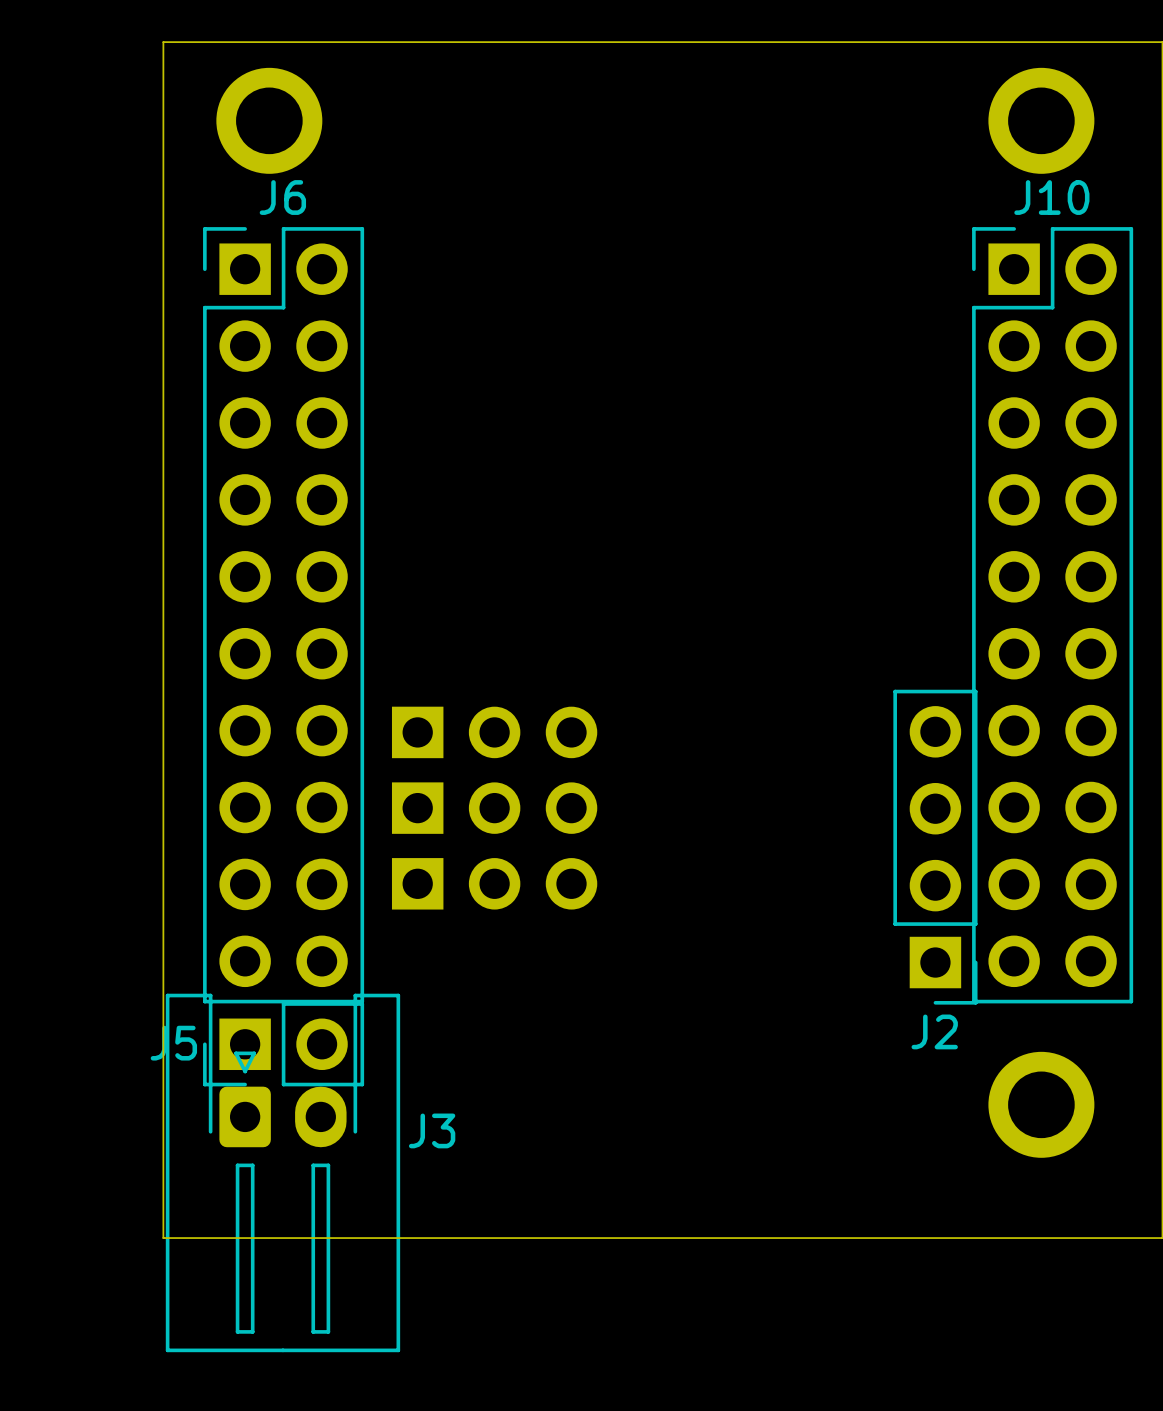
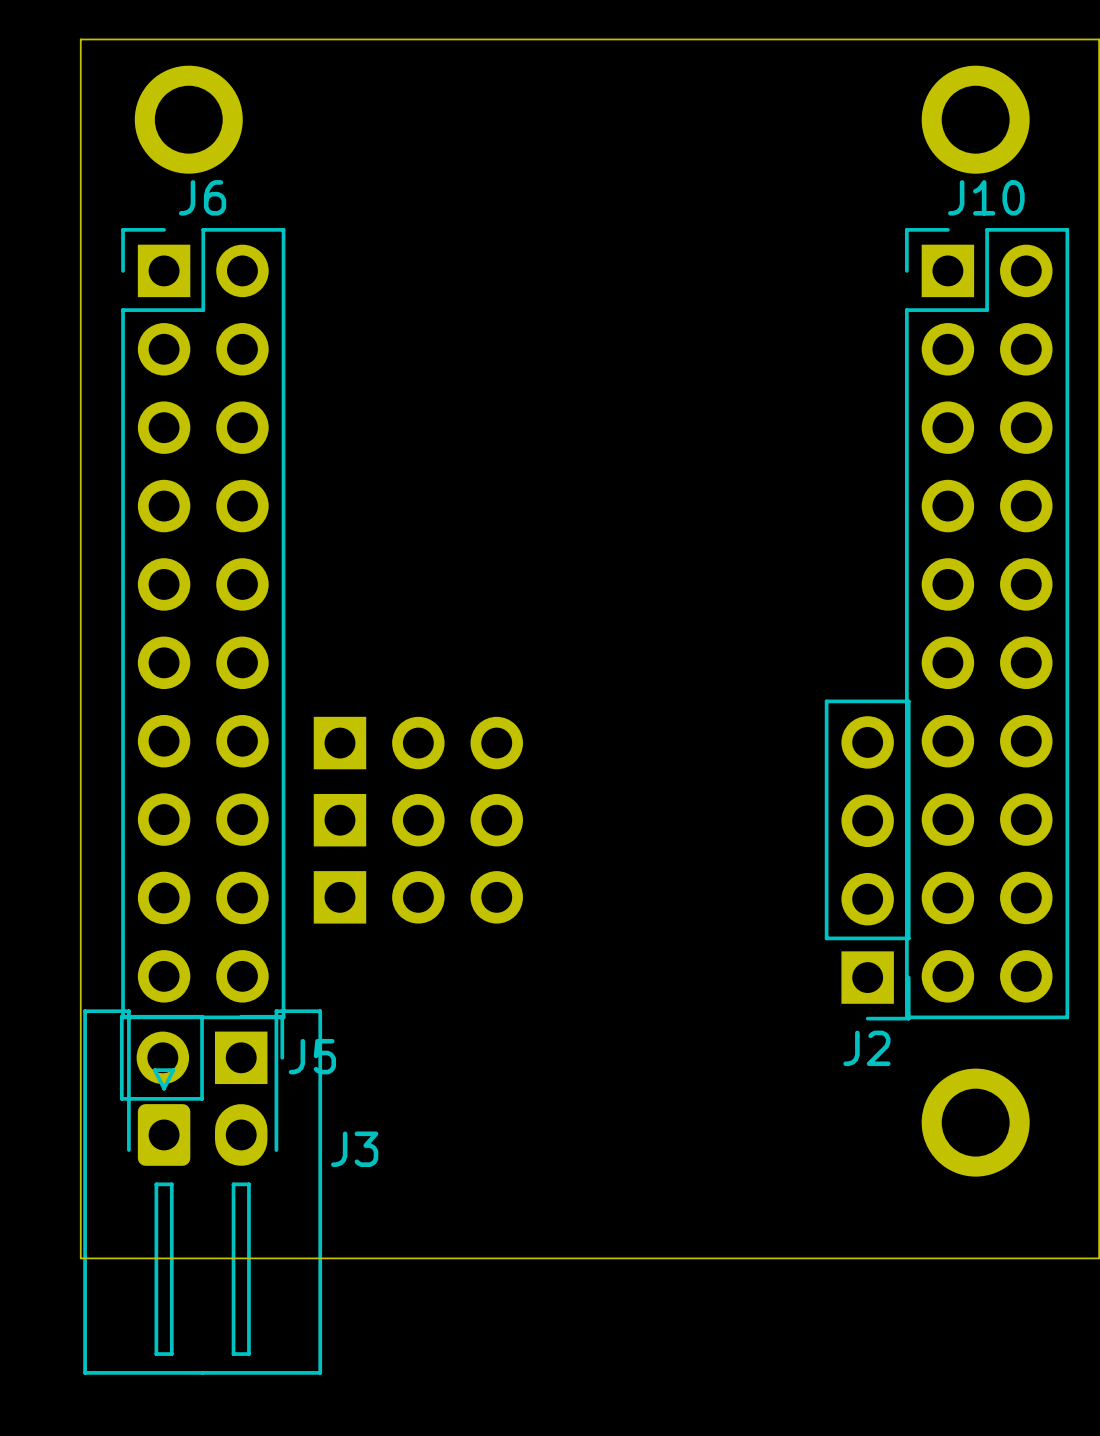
J5 rotation: 0° (283, 1044) -> 180° (202, 1057)

